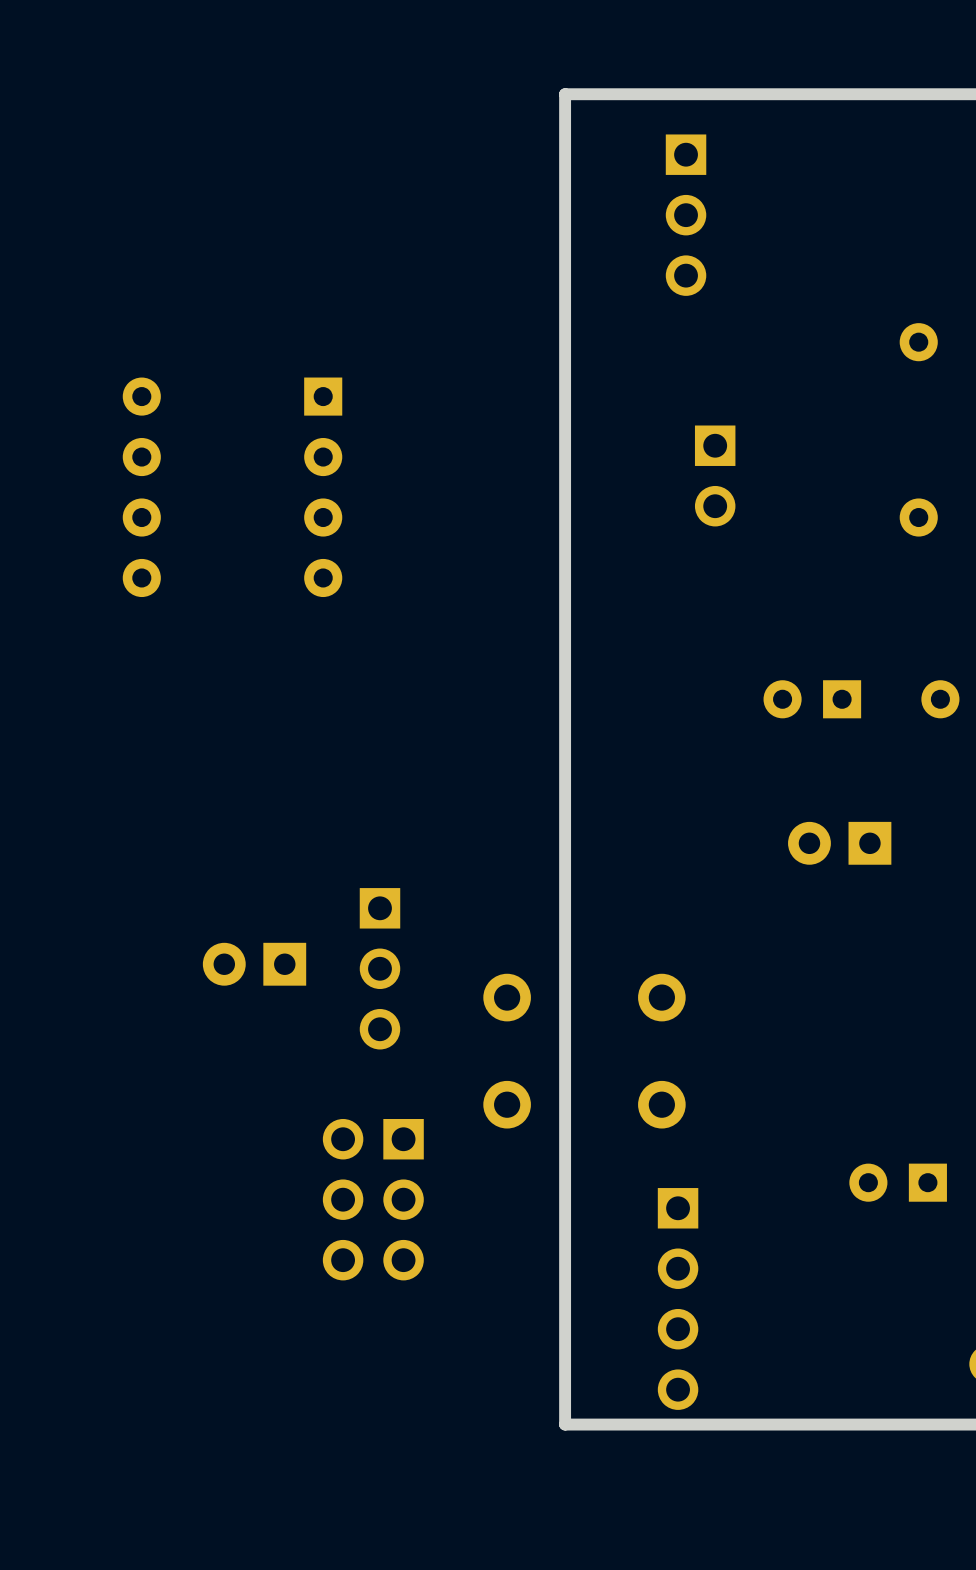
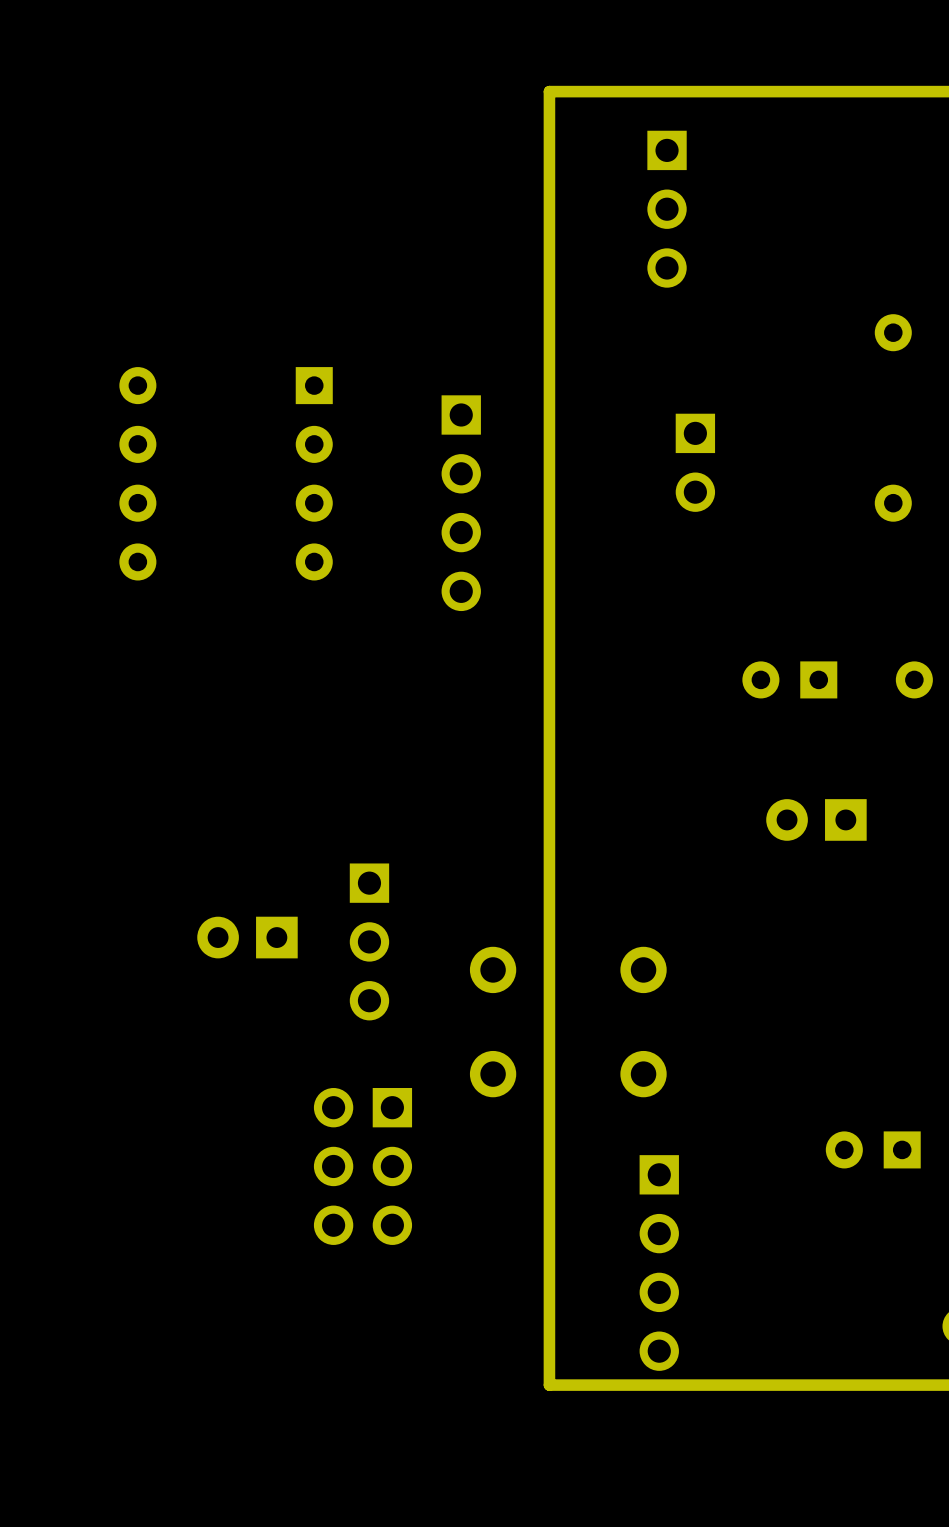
part: none -> (461, 503)

